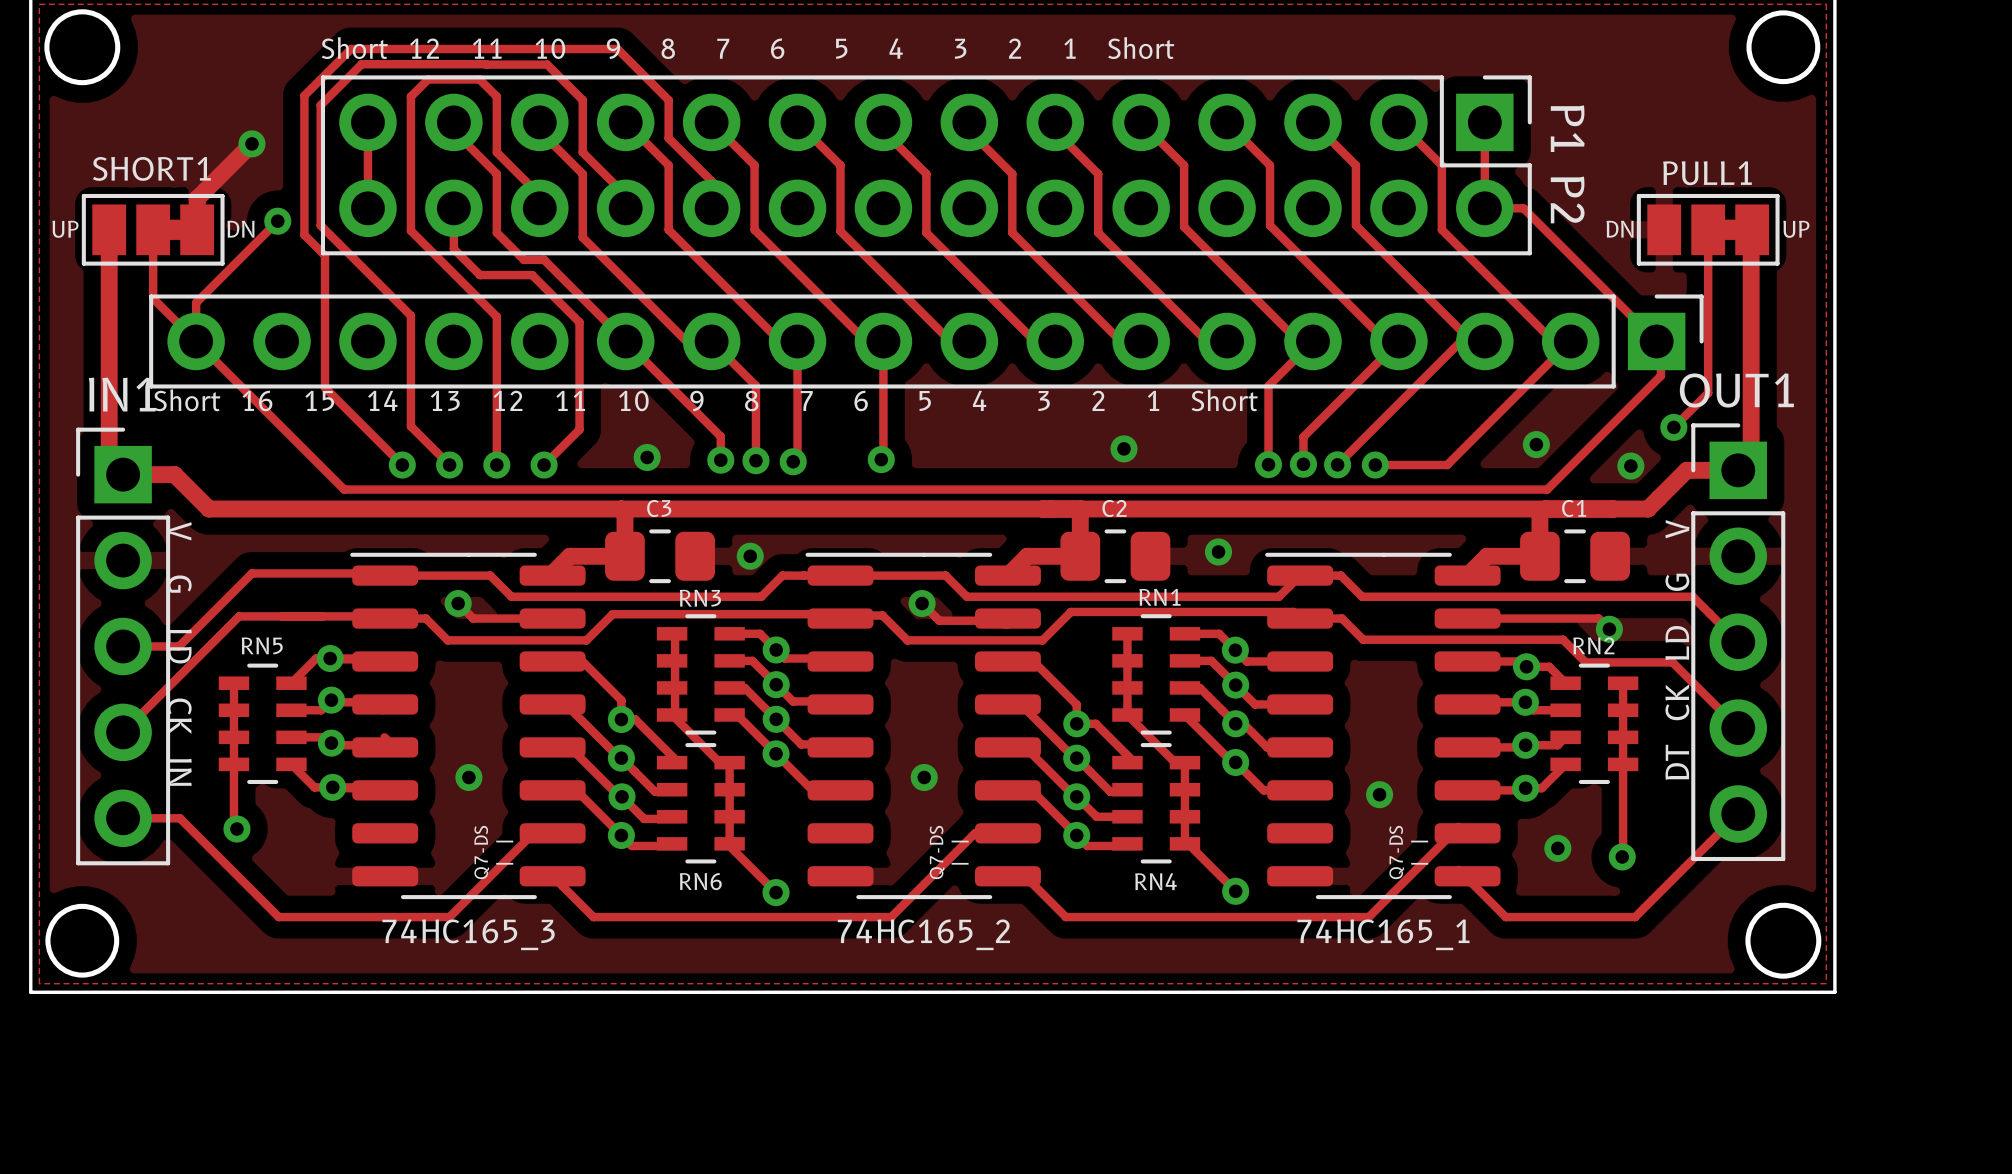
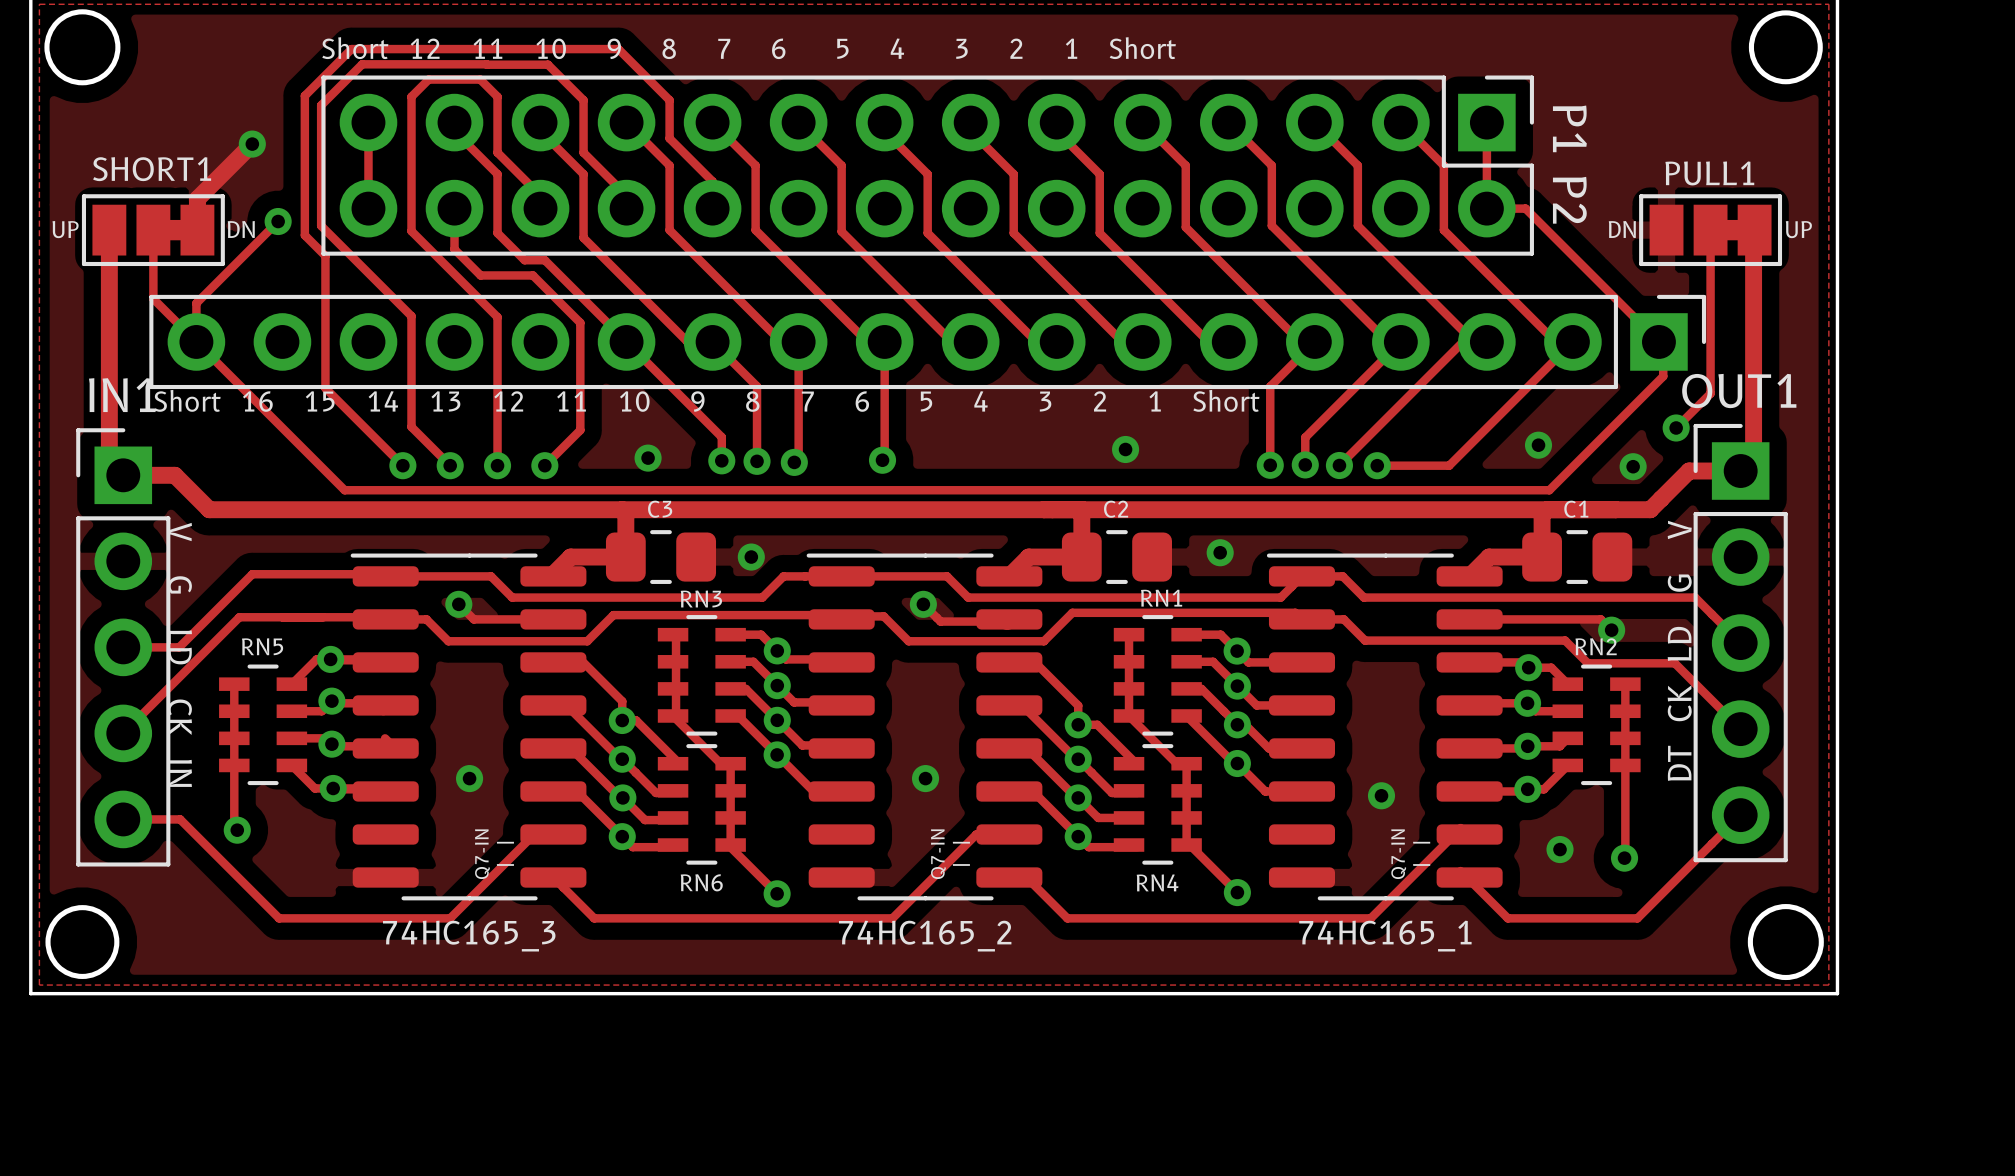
text: Q7-DS (481, 852) -> Q7-IN (482, 854)
text: Q7-DS (937, 852) -> Q7-IN (938, 854)
text: Q7-DS (1396, 852) -> Q7-IN (1398, 854)

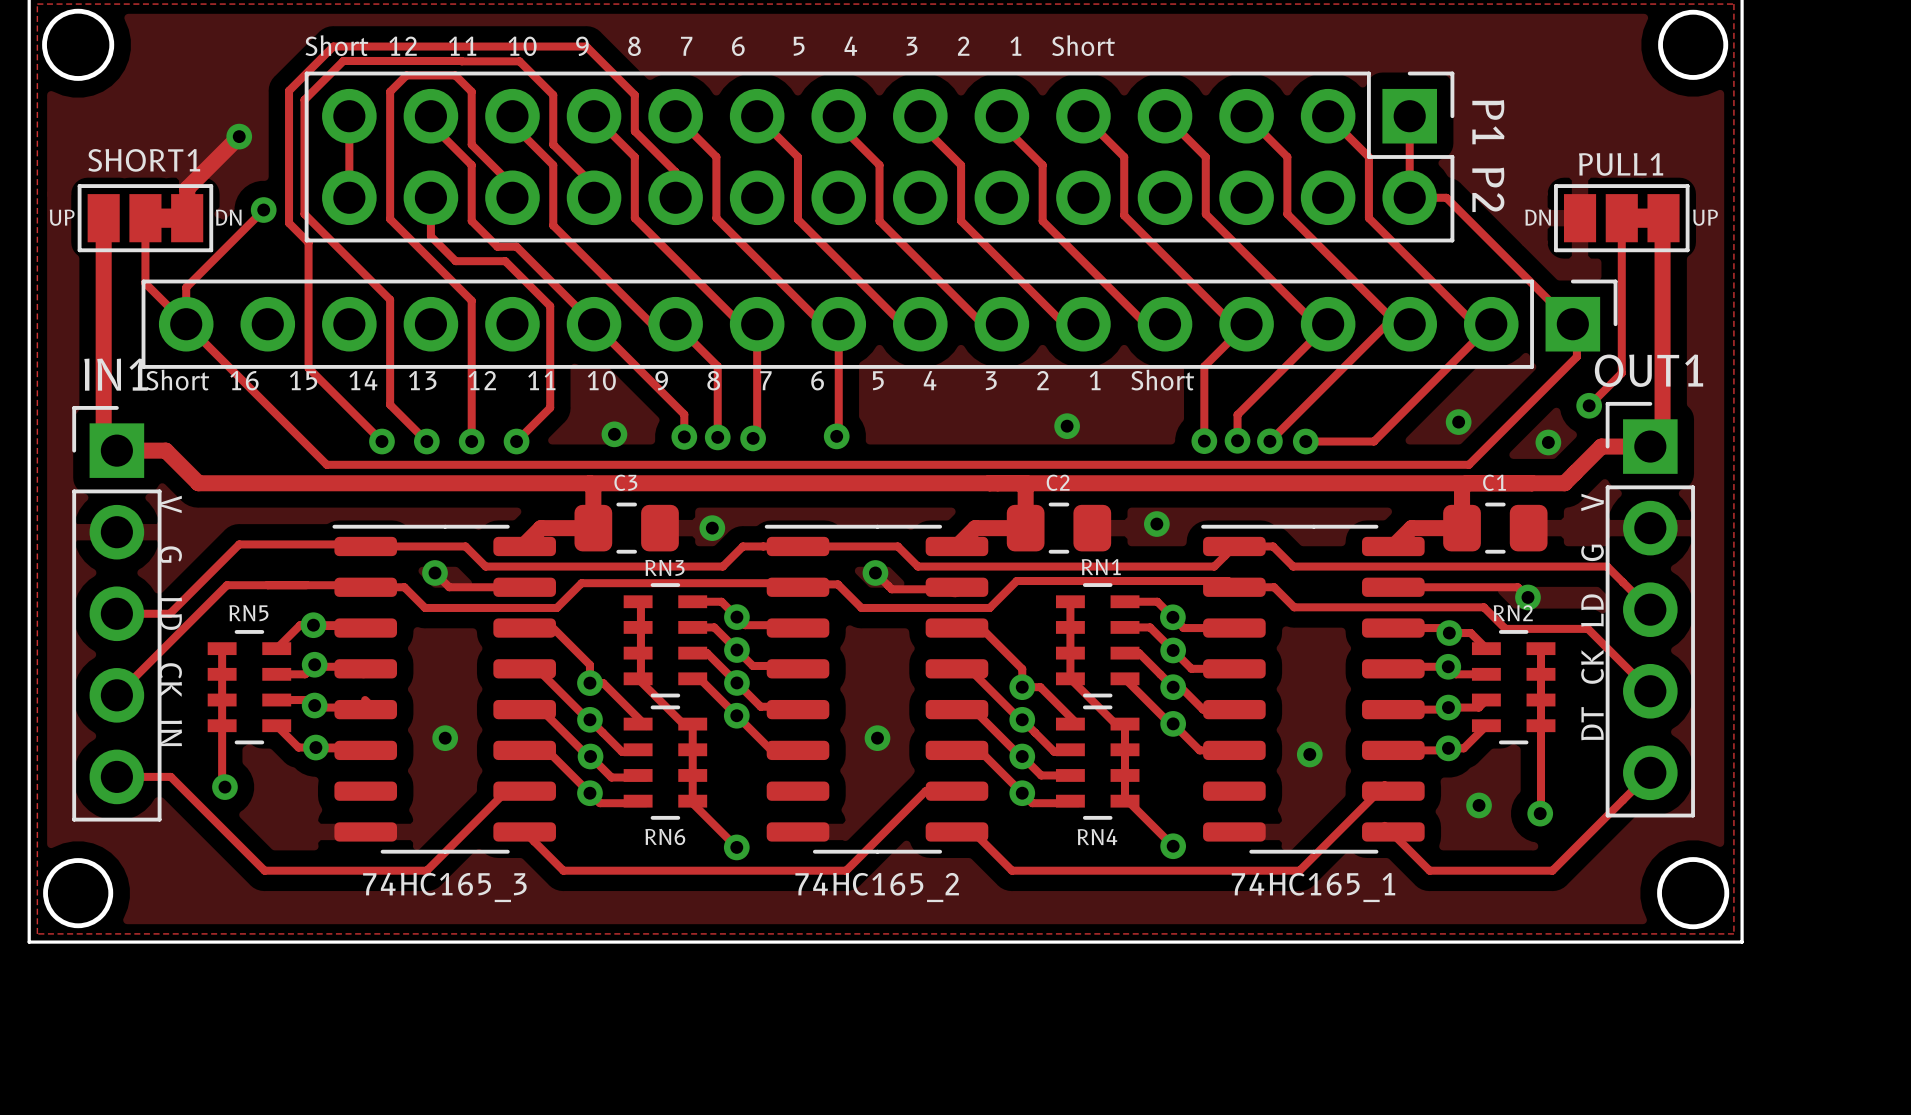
text: | | (505, 853) -> none
text: | | (961, 853) -> none
text: | | (1421, 853) -> none
text: Q7-IN (482, 854) -> none
text: Q7-IN (938, 854) -> none
text: Q7-IN (1398, 854) -> none

